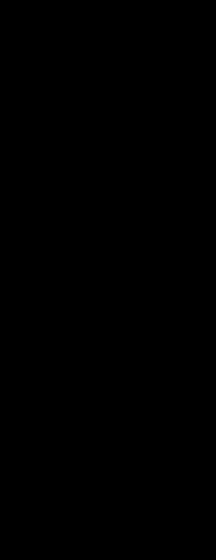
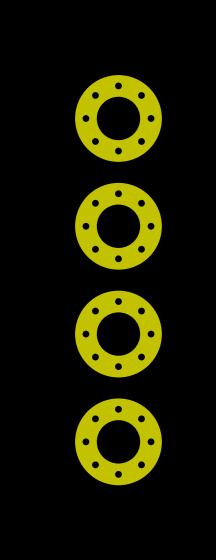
part: none -> (118, 118)
part: none -> (118, 226)
part: none -> (118, 334)
part: none -> (118, 441)

